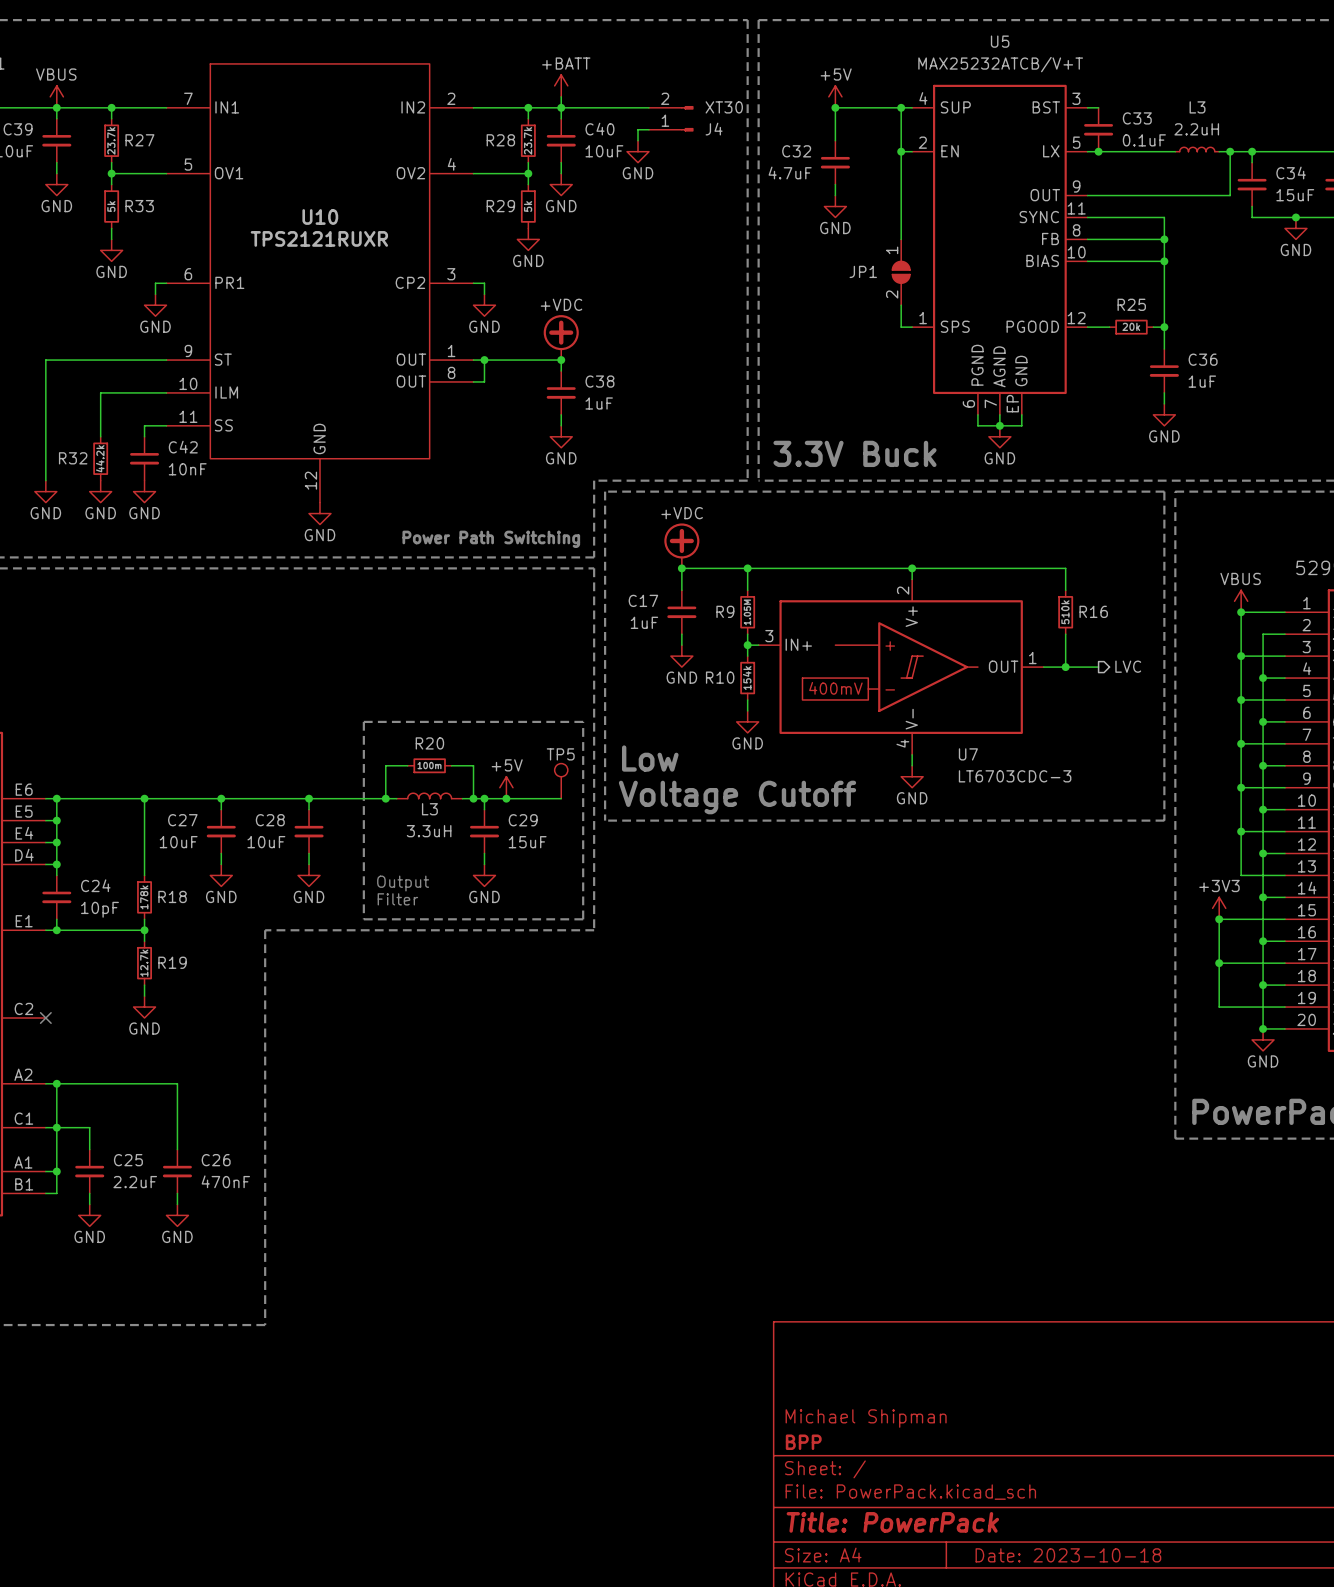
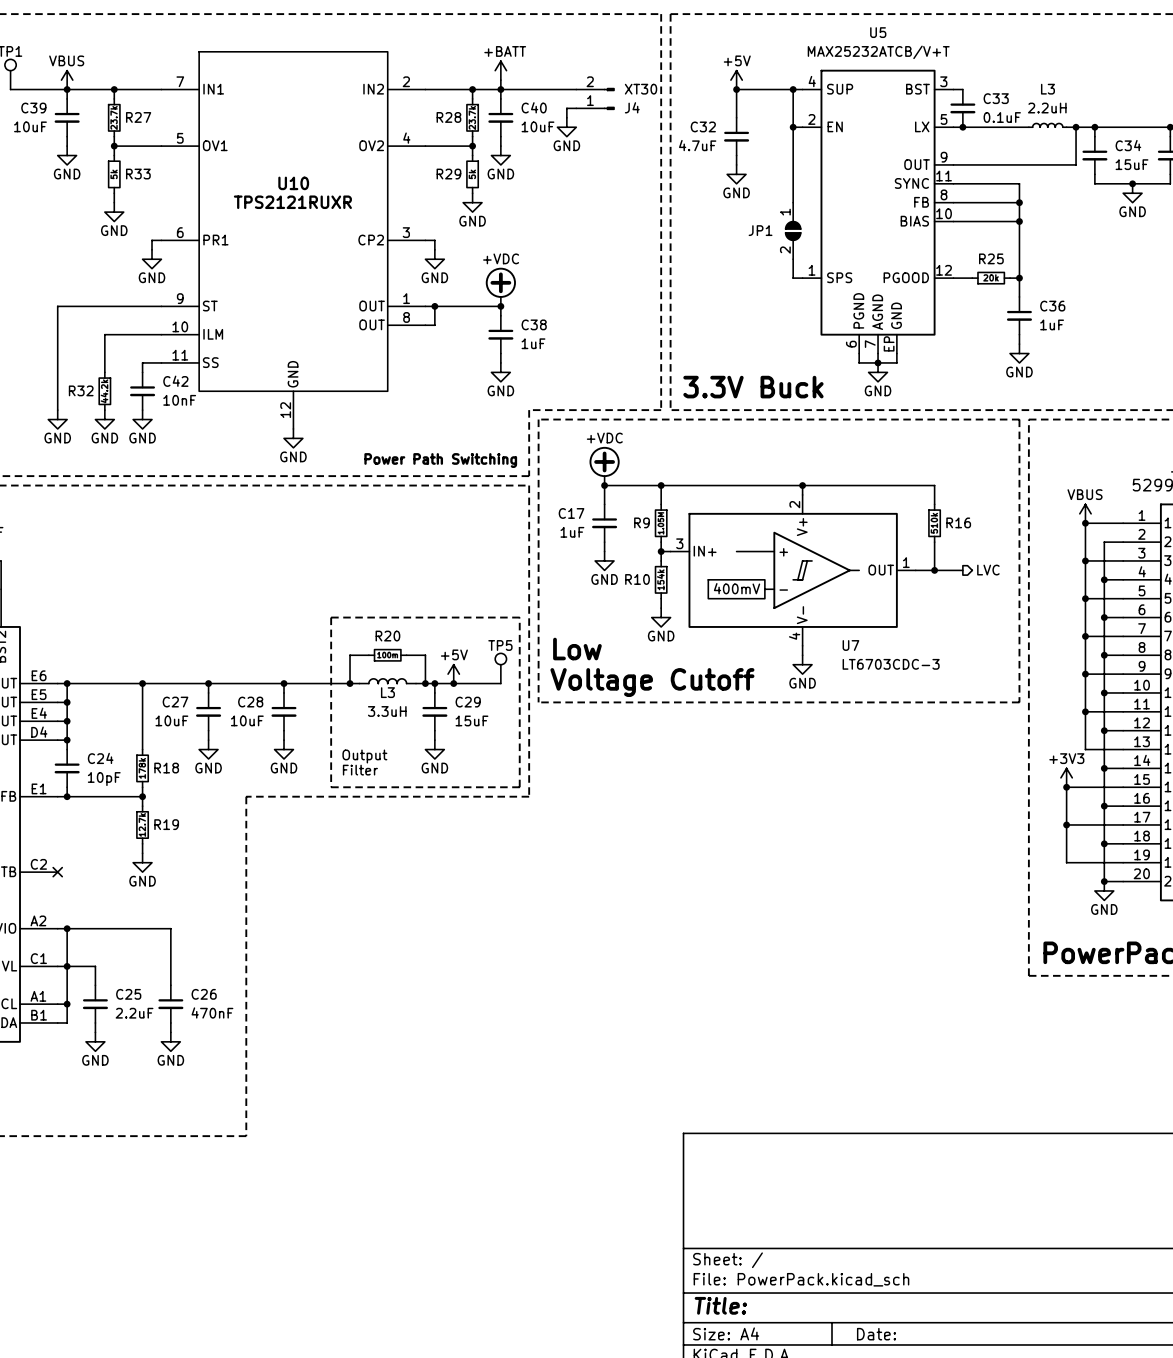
title block: Michael Shipman (866, 1418) -> none
title block: BPP (803, 1442) -> none
title block: Title: PowerPack (892, 1522) -> Title: (720, 1305)
title block: Date: 2023-10-18 (1068, 1555) -> Date: (876, 1334)

